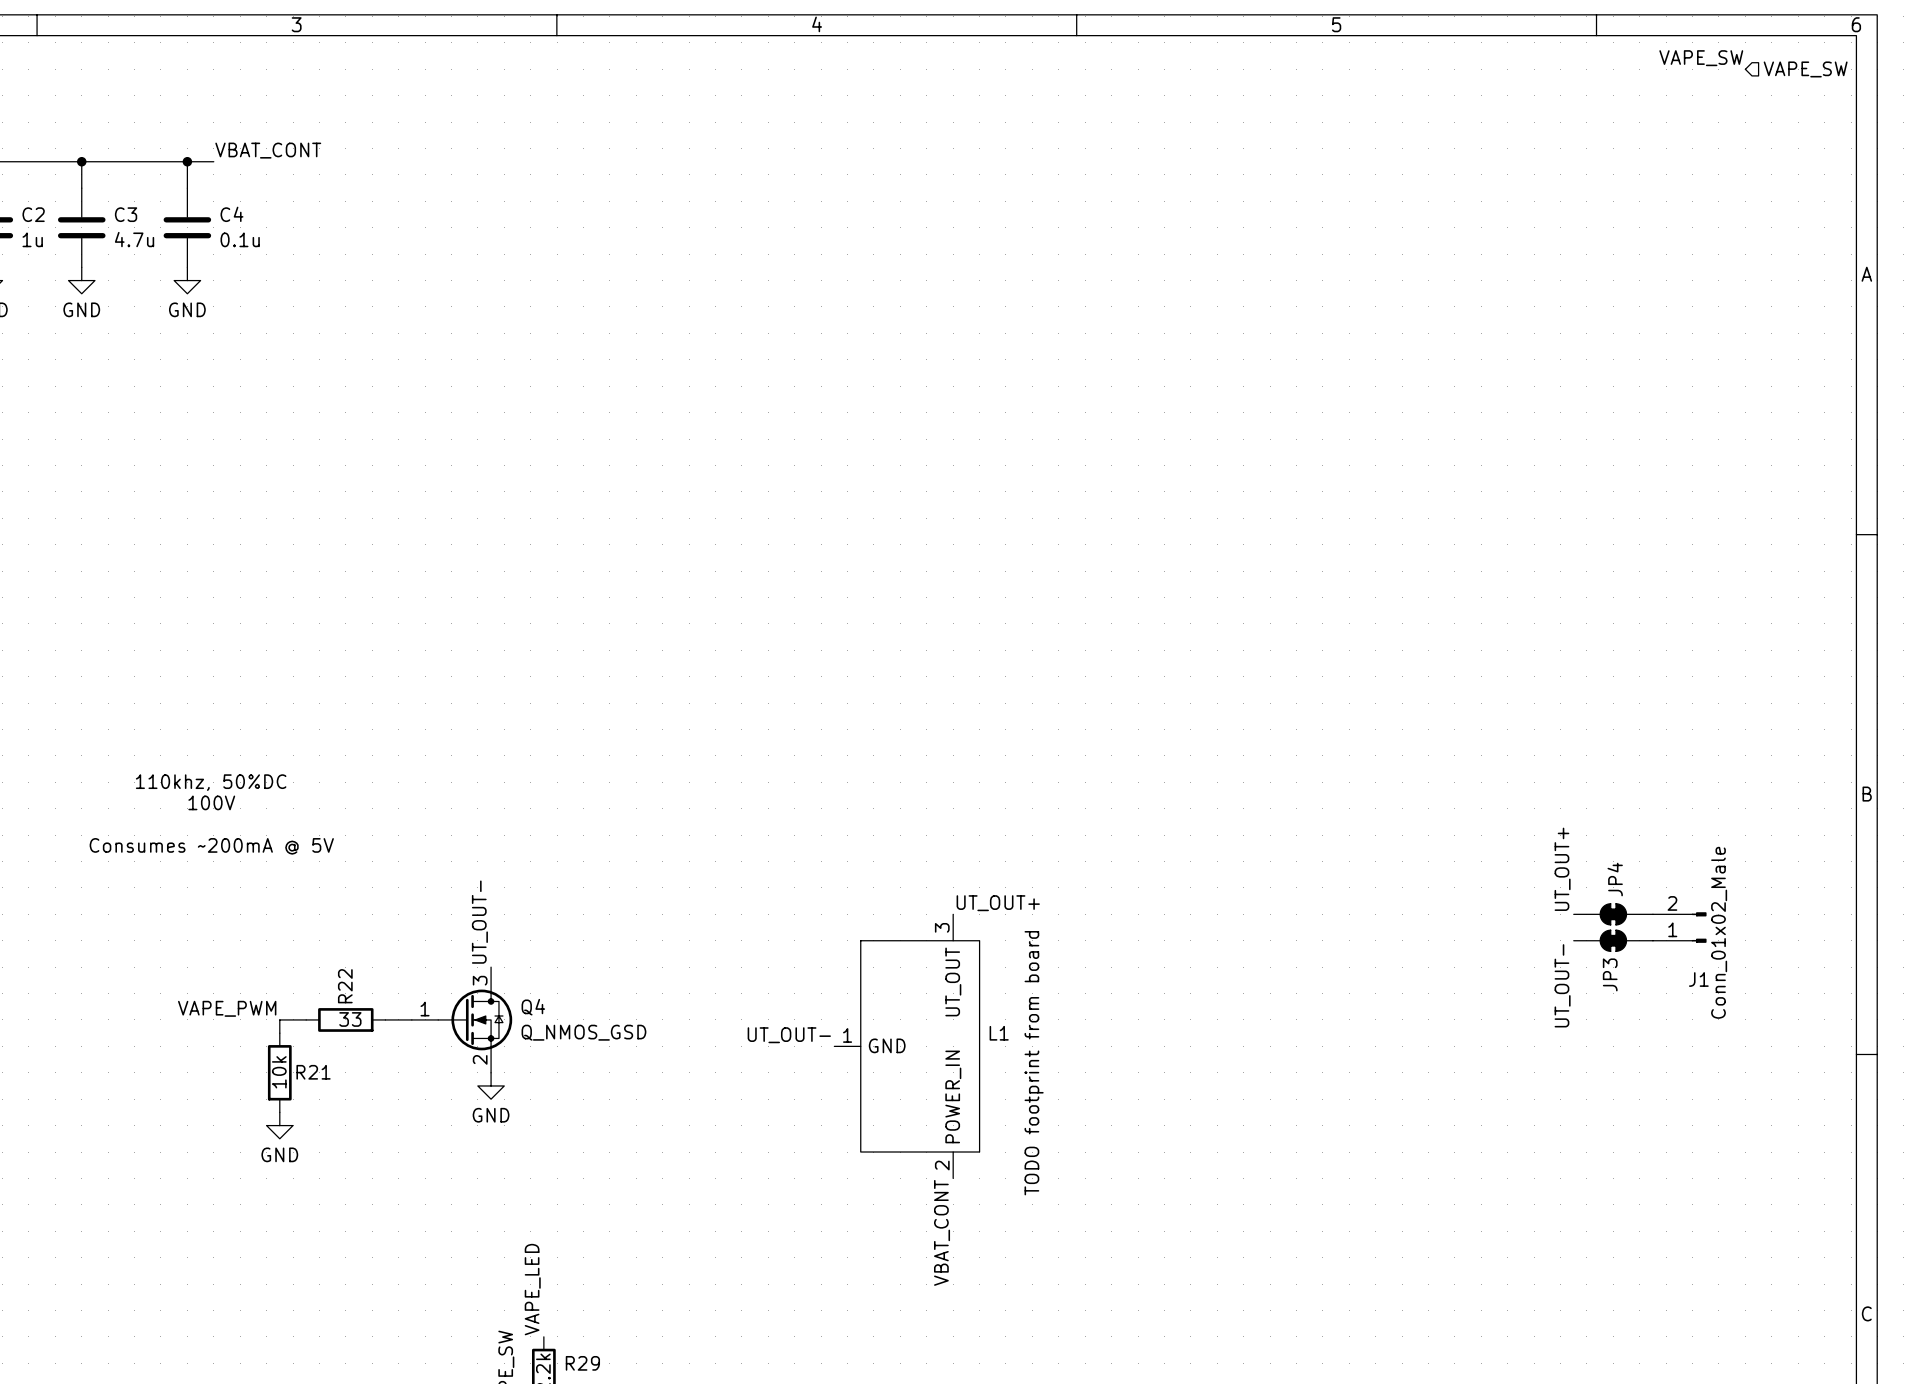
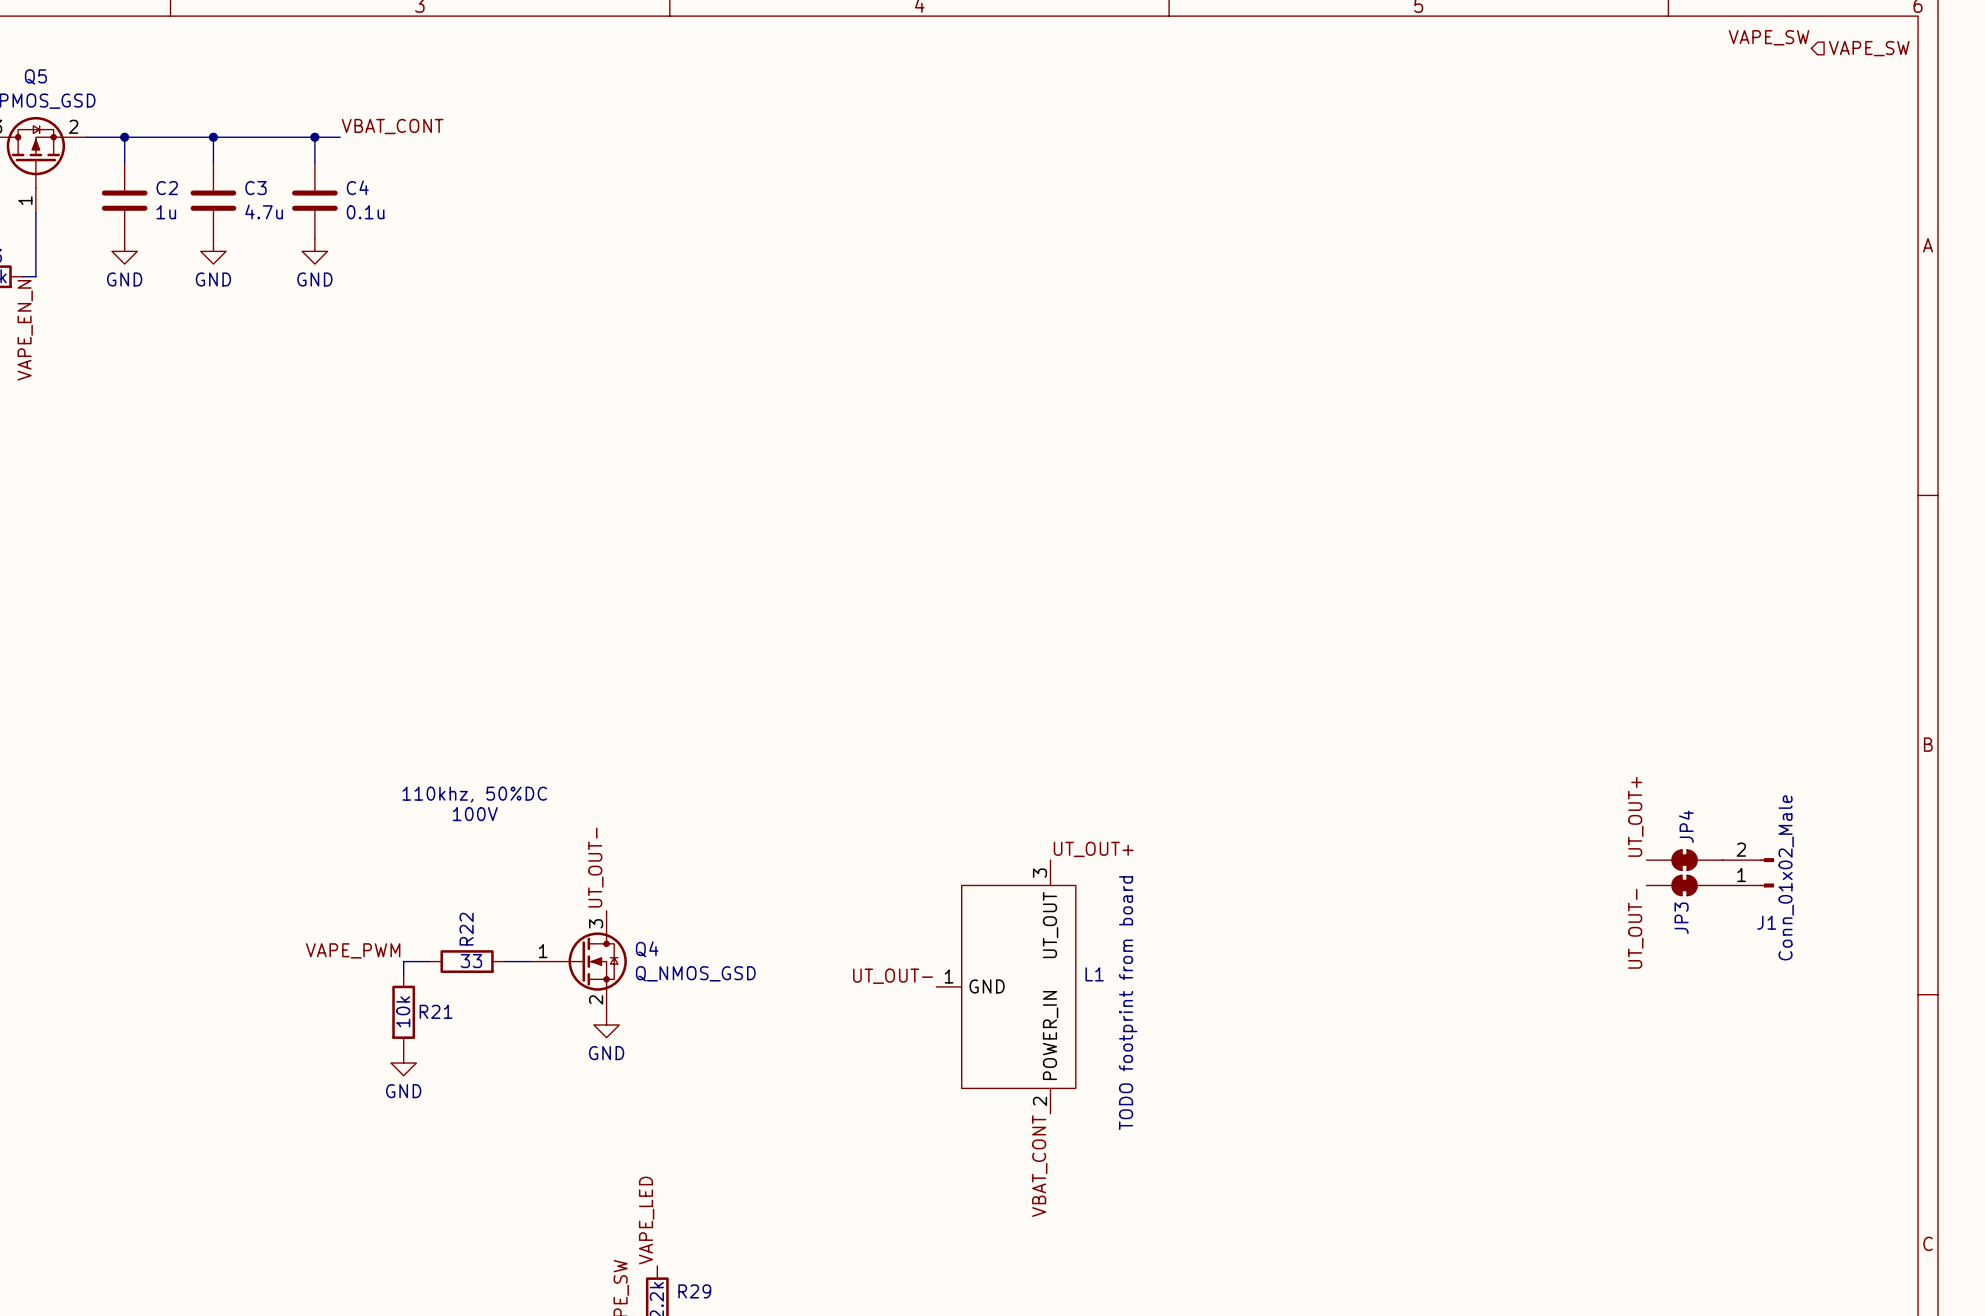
text position: 110khz, 50%DC (211, 782) -> 110khz, 50%DC (474, 794)
text position: 100V (211, 802) -> 100V (475, 814)
text: Consumes ~200mA @ 5V (211, 846) -> none

